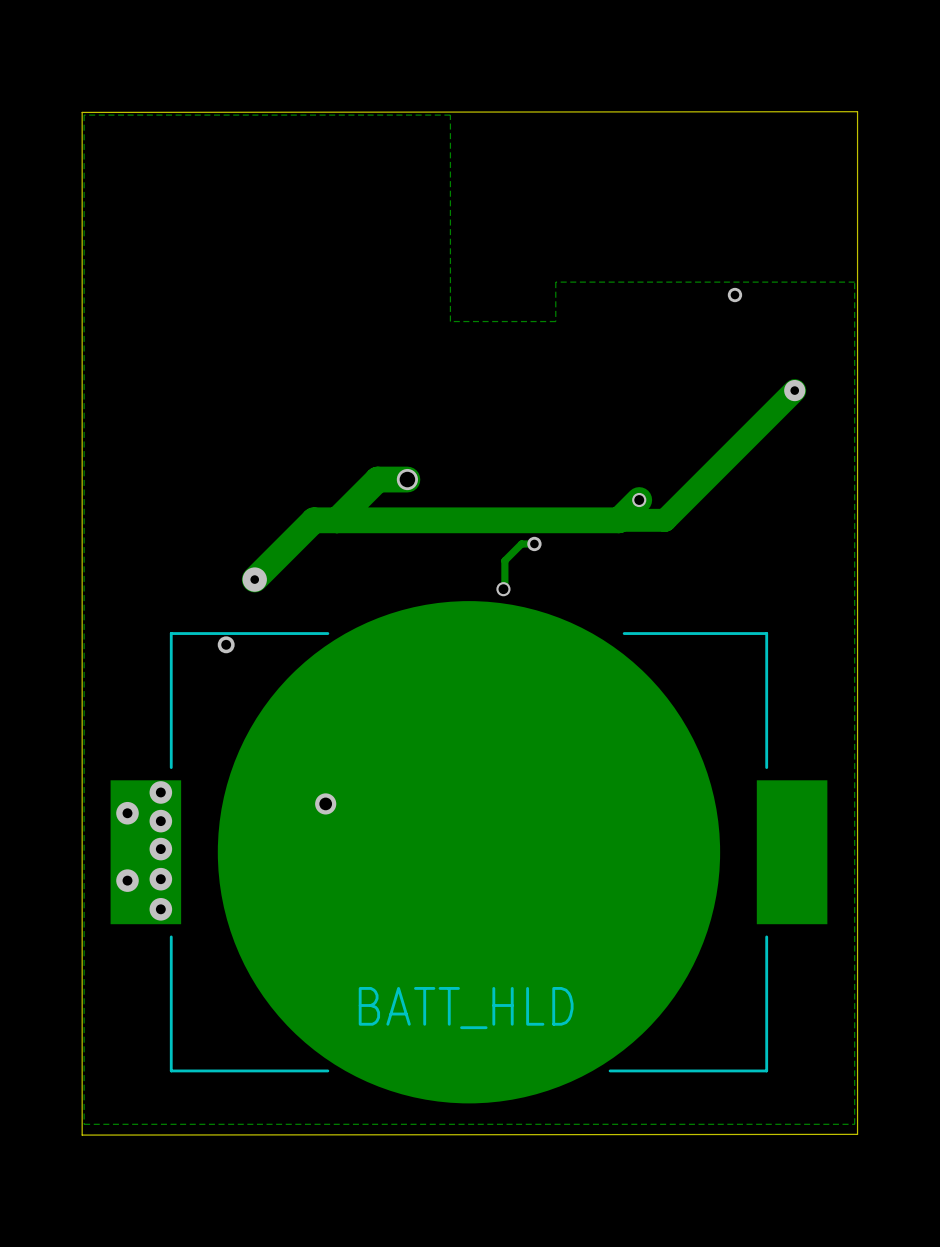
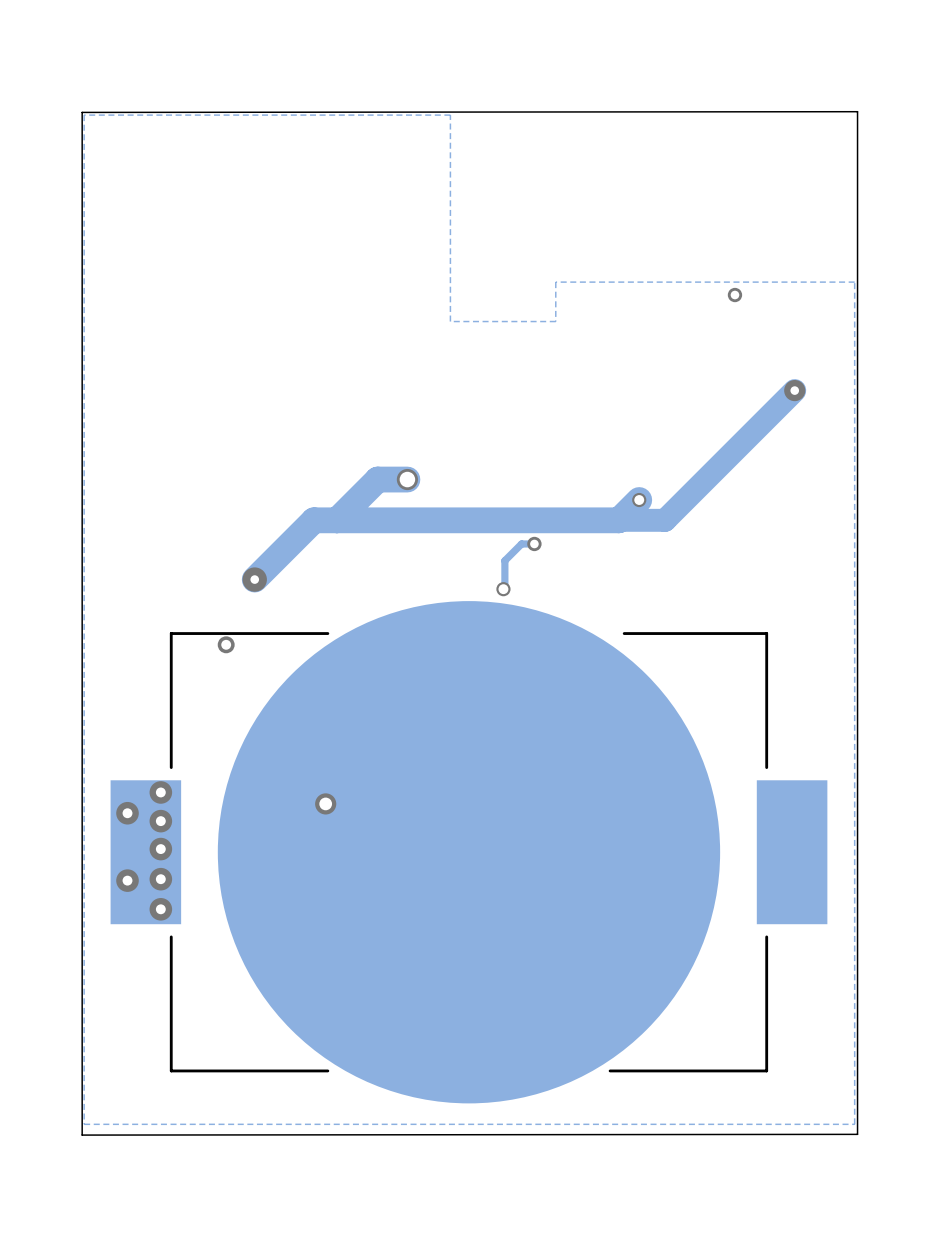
BATT_HLD name: BATT_HLD (466, 1008) -> none

